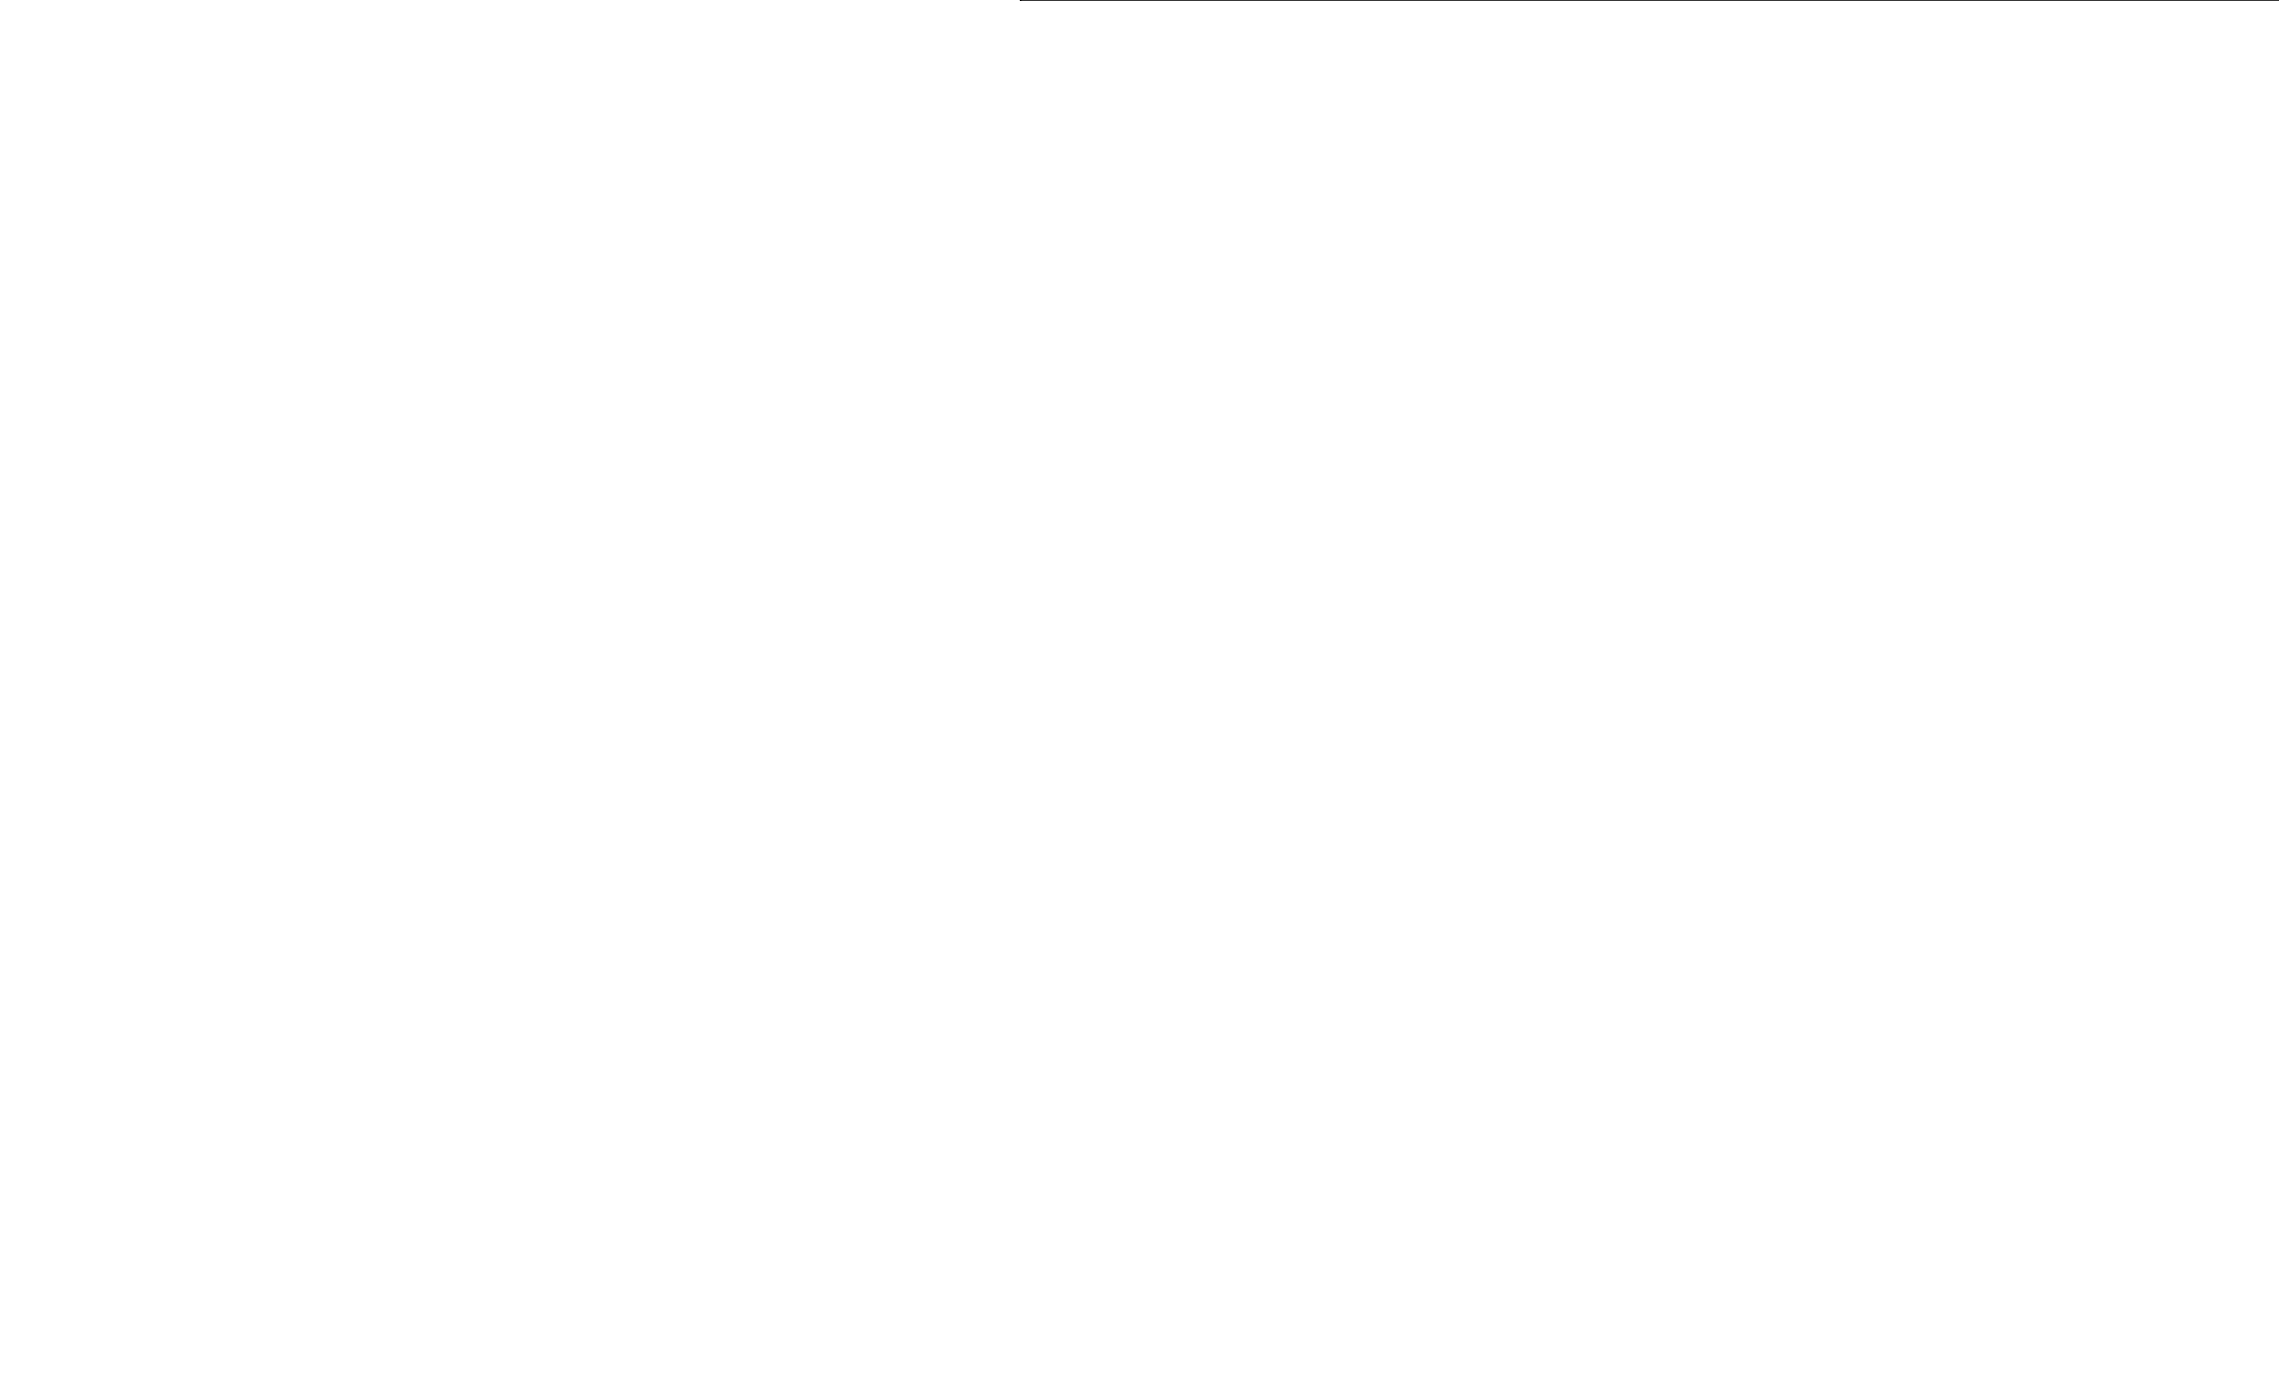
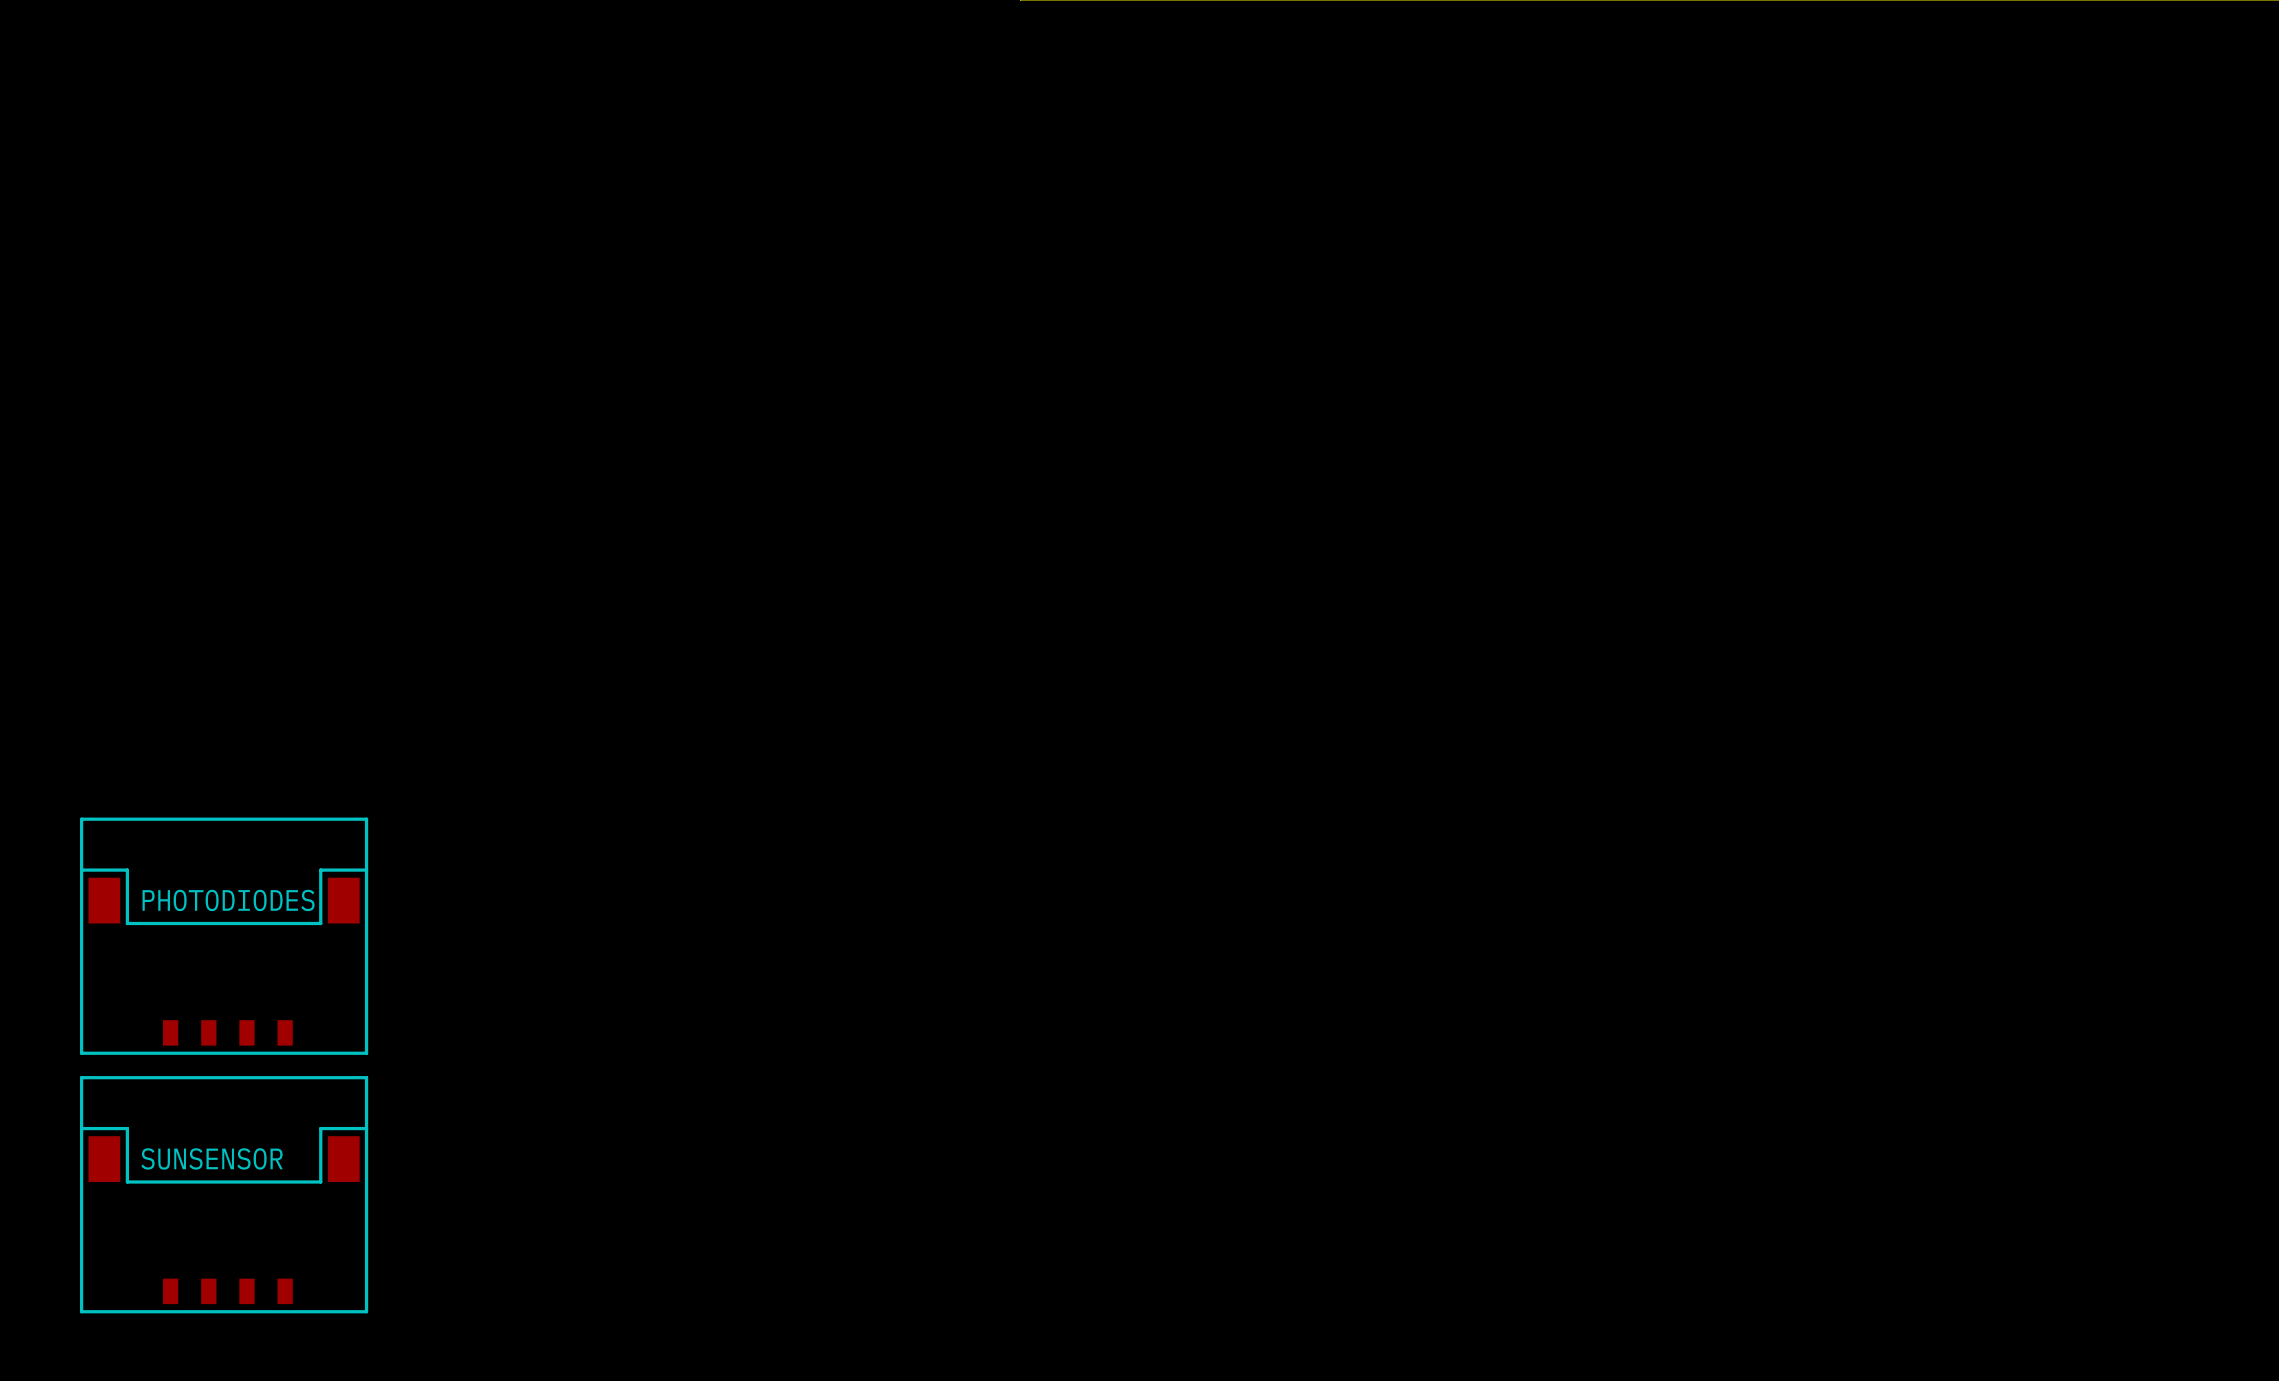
PHOTODIODES: none -> (224, 936)
SUNSENSOR: none -> (224, 1194)

